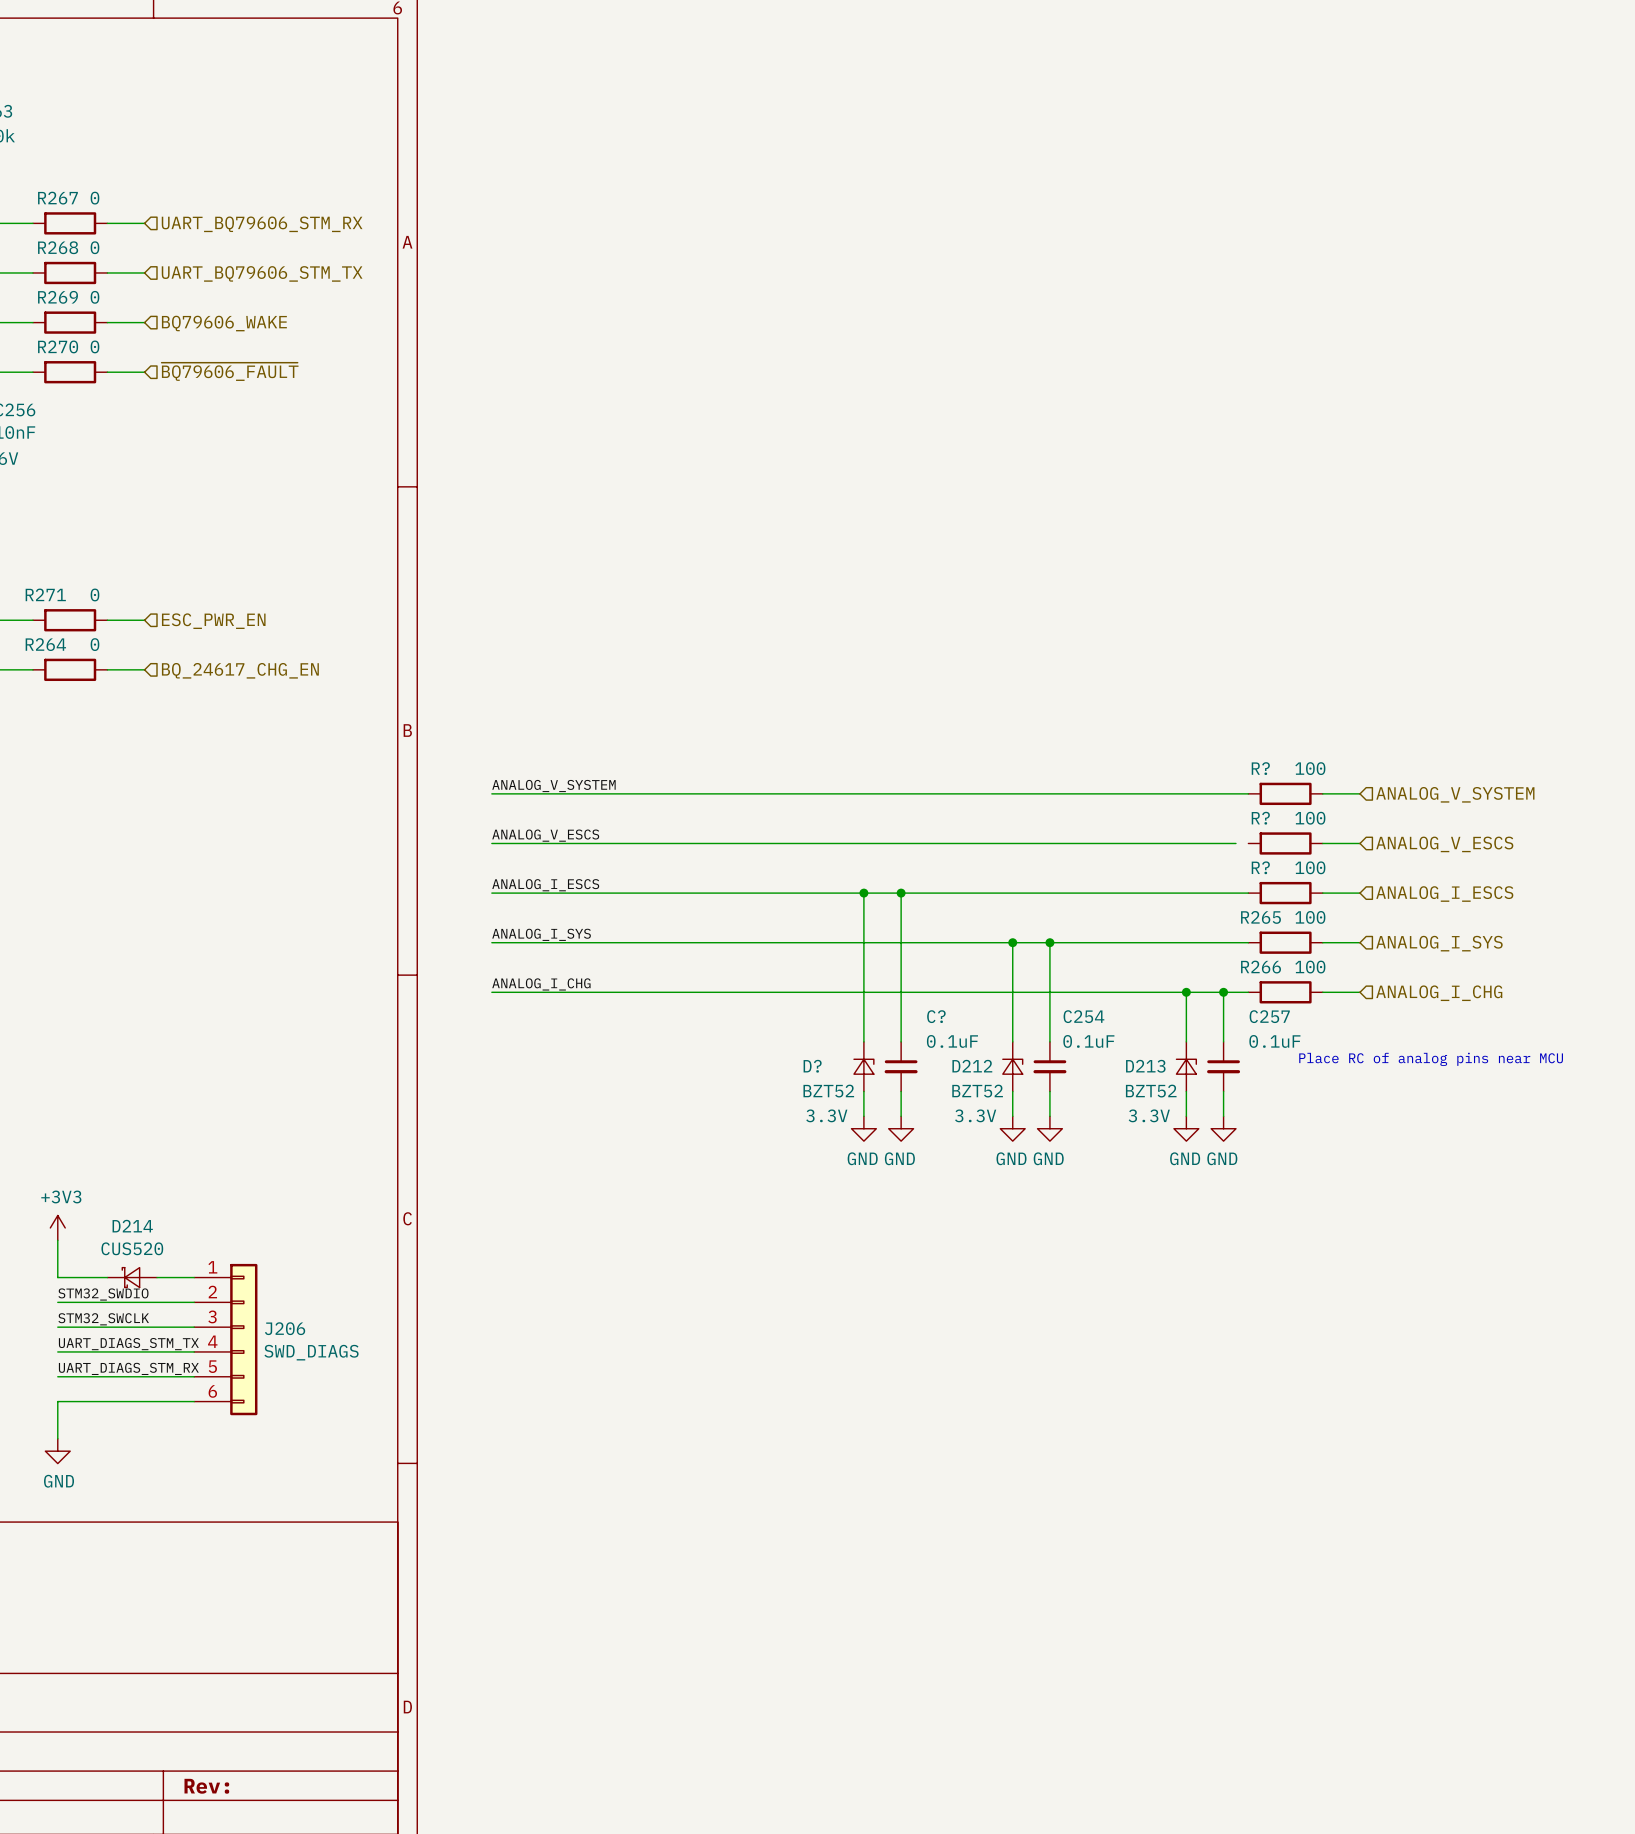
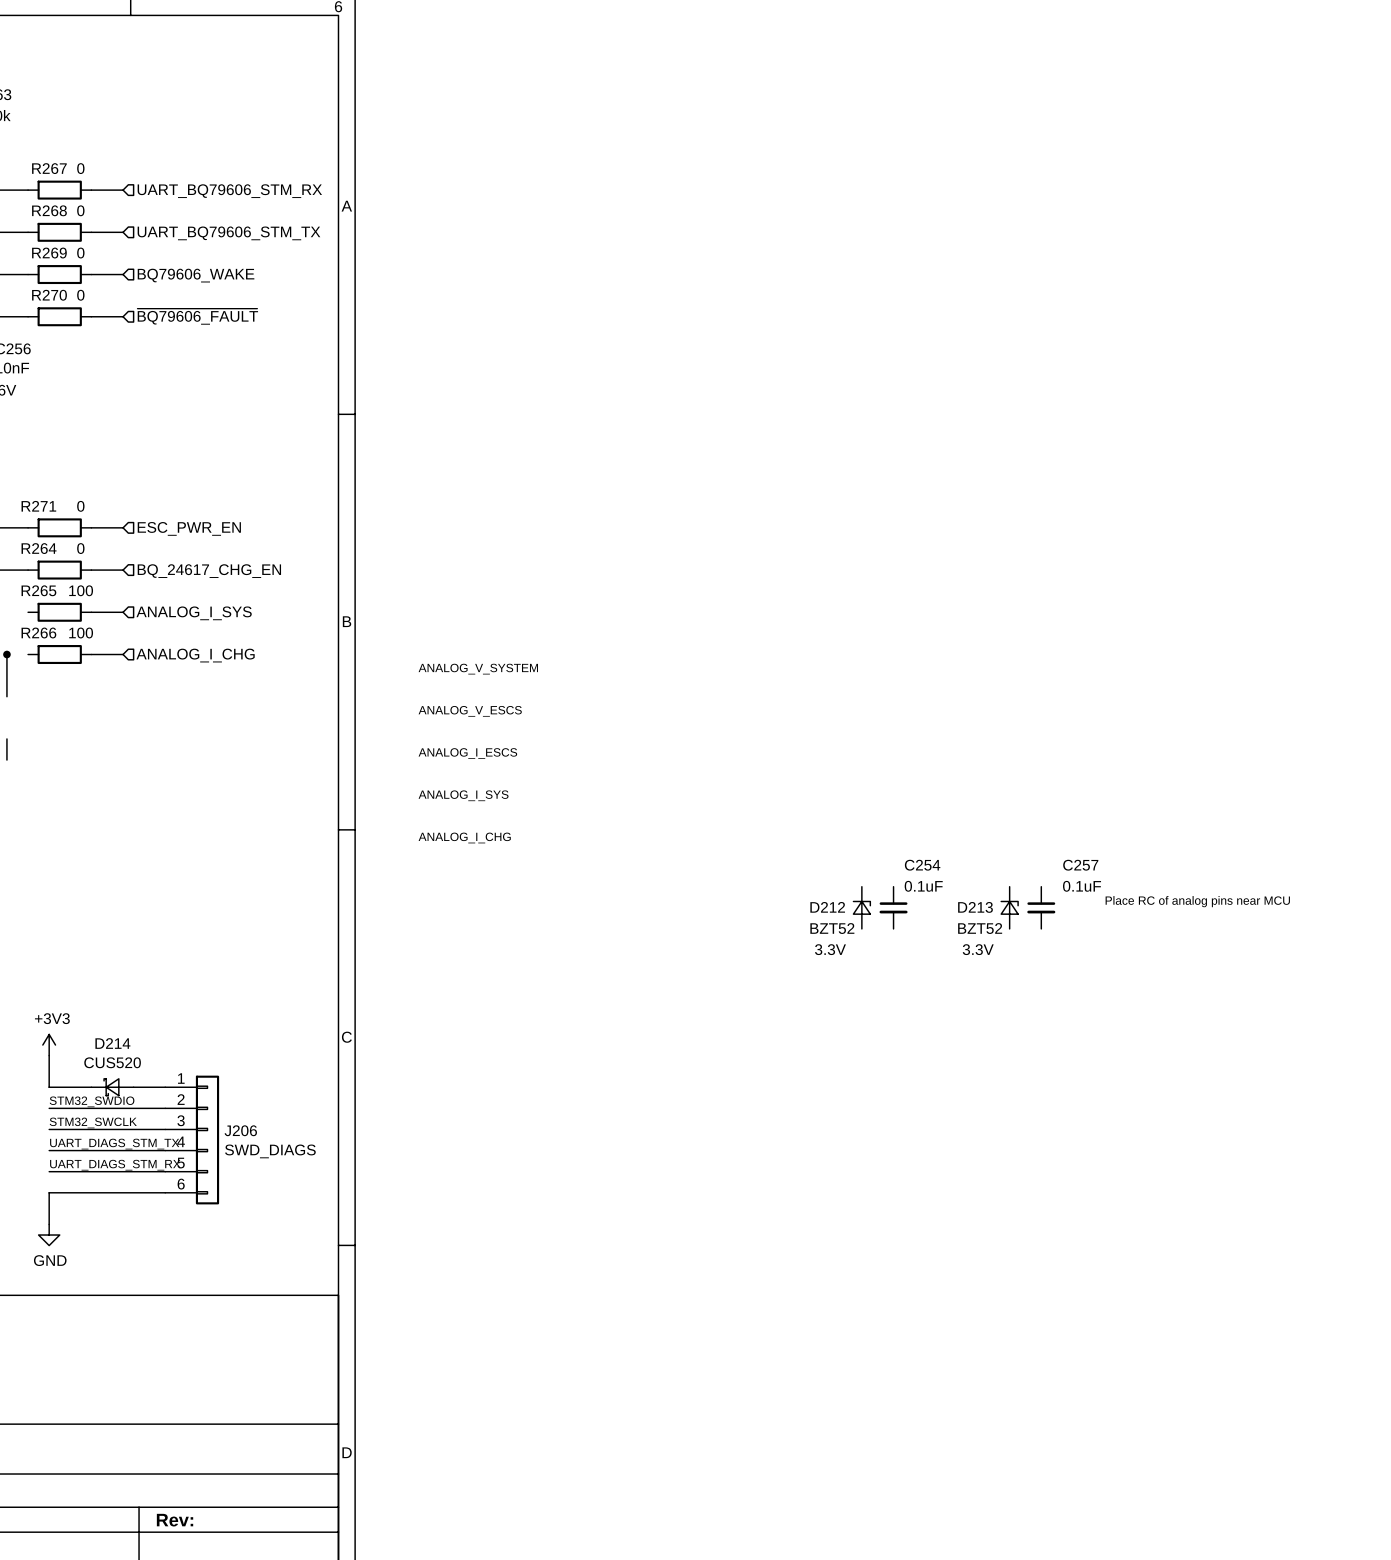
wire: none -> (91, 612) (123, 612)
hierarchical label: none -> ANALOG_I_SYS (194, 613)
wire: none -> (6, 654) (6, 696)
junction: none -> (6, 654)
wire: none -> (91, 654) (123, 654)
hierarchical label: none -> ANALOG_I_CHG (195, 655)
wire: (491, 793) (1248, 793) -> none
R?: 100 (1285, 793) -> none
wire: (1322, 793) (1360, 793) -> none
hierarchical label: ANALOG_V_SYSTEM (1455, 794) -> none
wire: (491, 843) (1235, 843) -> none
R?: 100 (1285, 843) -> none
wire: (1322, 843) (1360, 843) -> none
hierarchical label: ANALOG_V_ESCS (1444, 844) -> none
wire: none -> (6, 738) (6, 760)
wire: (491, 893) (1248, 893) -> none
wire: (863, 893) (863, 1041) -> none
junction: (863, 893) -> none
wire: (901, 893) (901, 1041) -> none
junction: (901, 893) -> none
R?: 100 (1285, 893) -> none
wire: (1322, 893) (1360, 893) -> none
hierarchical label: ANALOG_I_ESCS (1444, 894) -> none
wire: (491, 942) (1248, 942) -> none
wire: (1012, 942) (1012, 1041) -> none
junction: (1012, 942) -> none
wire: (1049, 942) (1049, 1041) -> none
junction: (1049, 942) -> none
R265 position: (1285, 942) -> (59, 612)
wire: (1322, 942) (1360, 942) -> none
hierarchical label: ANALOG_I_SYS (1439, 943) -> none
wire: (491, 992) (1248, 992) -> none
wire: (1186, 992) (1186, 1041) -> none
junction: (1186, 992) -> none
wire: (1223, 992) (1223, 1041) -> none
junction: (1223, 992) -> none
R266 position: (1285, 992) -> (59, 654)
wire: (1322, 992) (1360, 992) -> none
hierarchical label: ANALOG_I_CHG (1439, 993) -> none
D?: BZT52 (863, 1066) -> none
C?: 0.1uF (901, 1066) -> none
wire: (863, 1091) (863, 1116) -> none
wire: (901, 1091) (901, 1116) -> none
wire: (1012, 1091) (1012, 1116) -> none
wire: (1049, 1091) (1049, 1116) -> none
wire: (1186, 1091) (1186, 1116) -> none
wire: (1223, 1091) (1223, 1116) -> none
power symbol: GND (863, 1128) -> none
power symbol: GND (901, 1128) -> none
power symbol: GND (1012, 1128) -> none
power symbol: GND (1049, 1128) -> none
power symbol: GND (1186, 1128) -> none
power symbol: GND (1223, 1128) -> none

